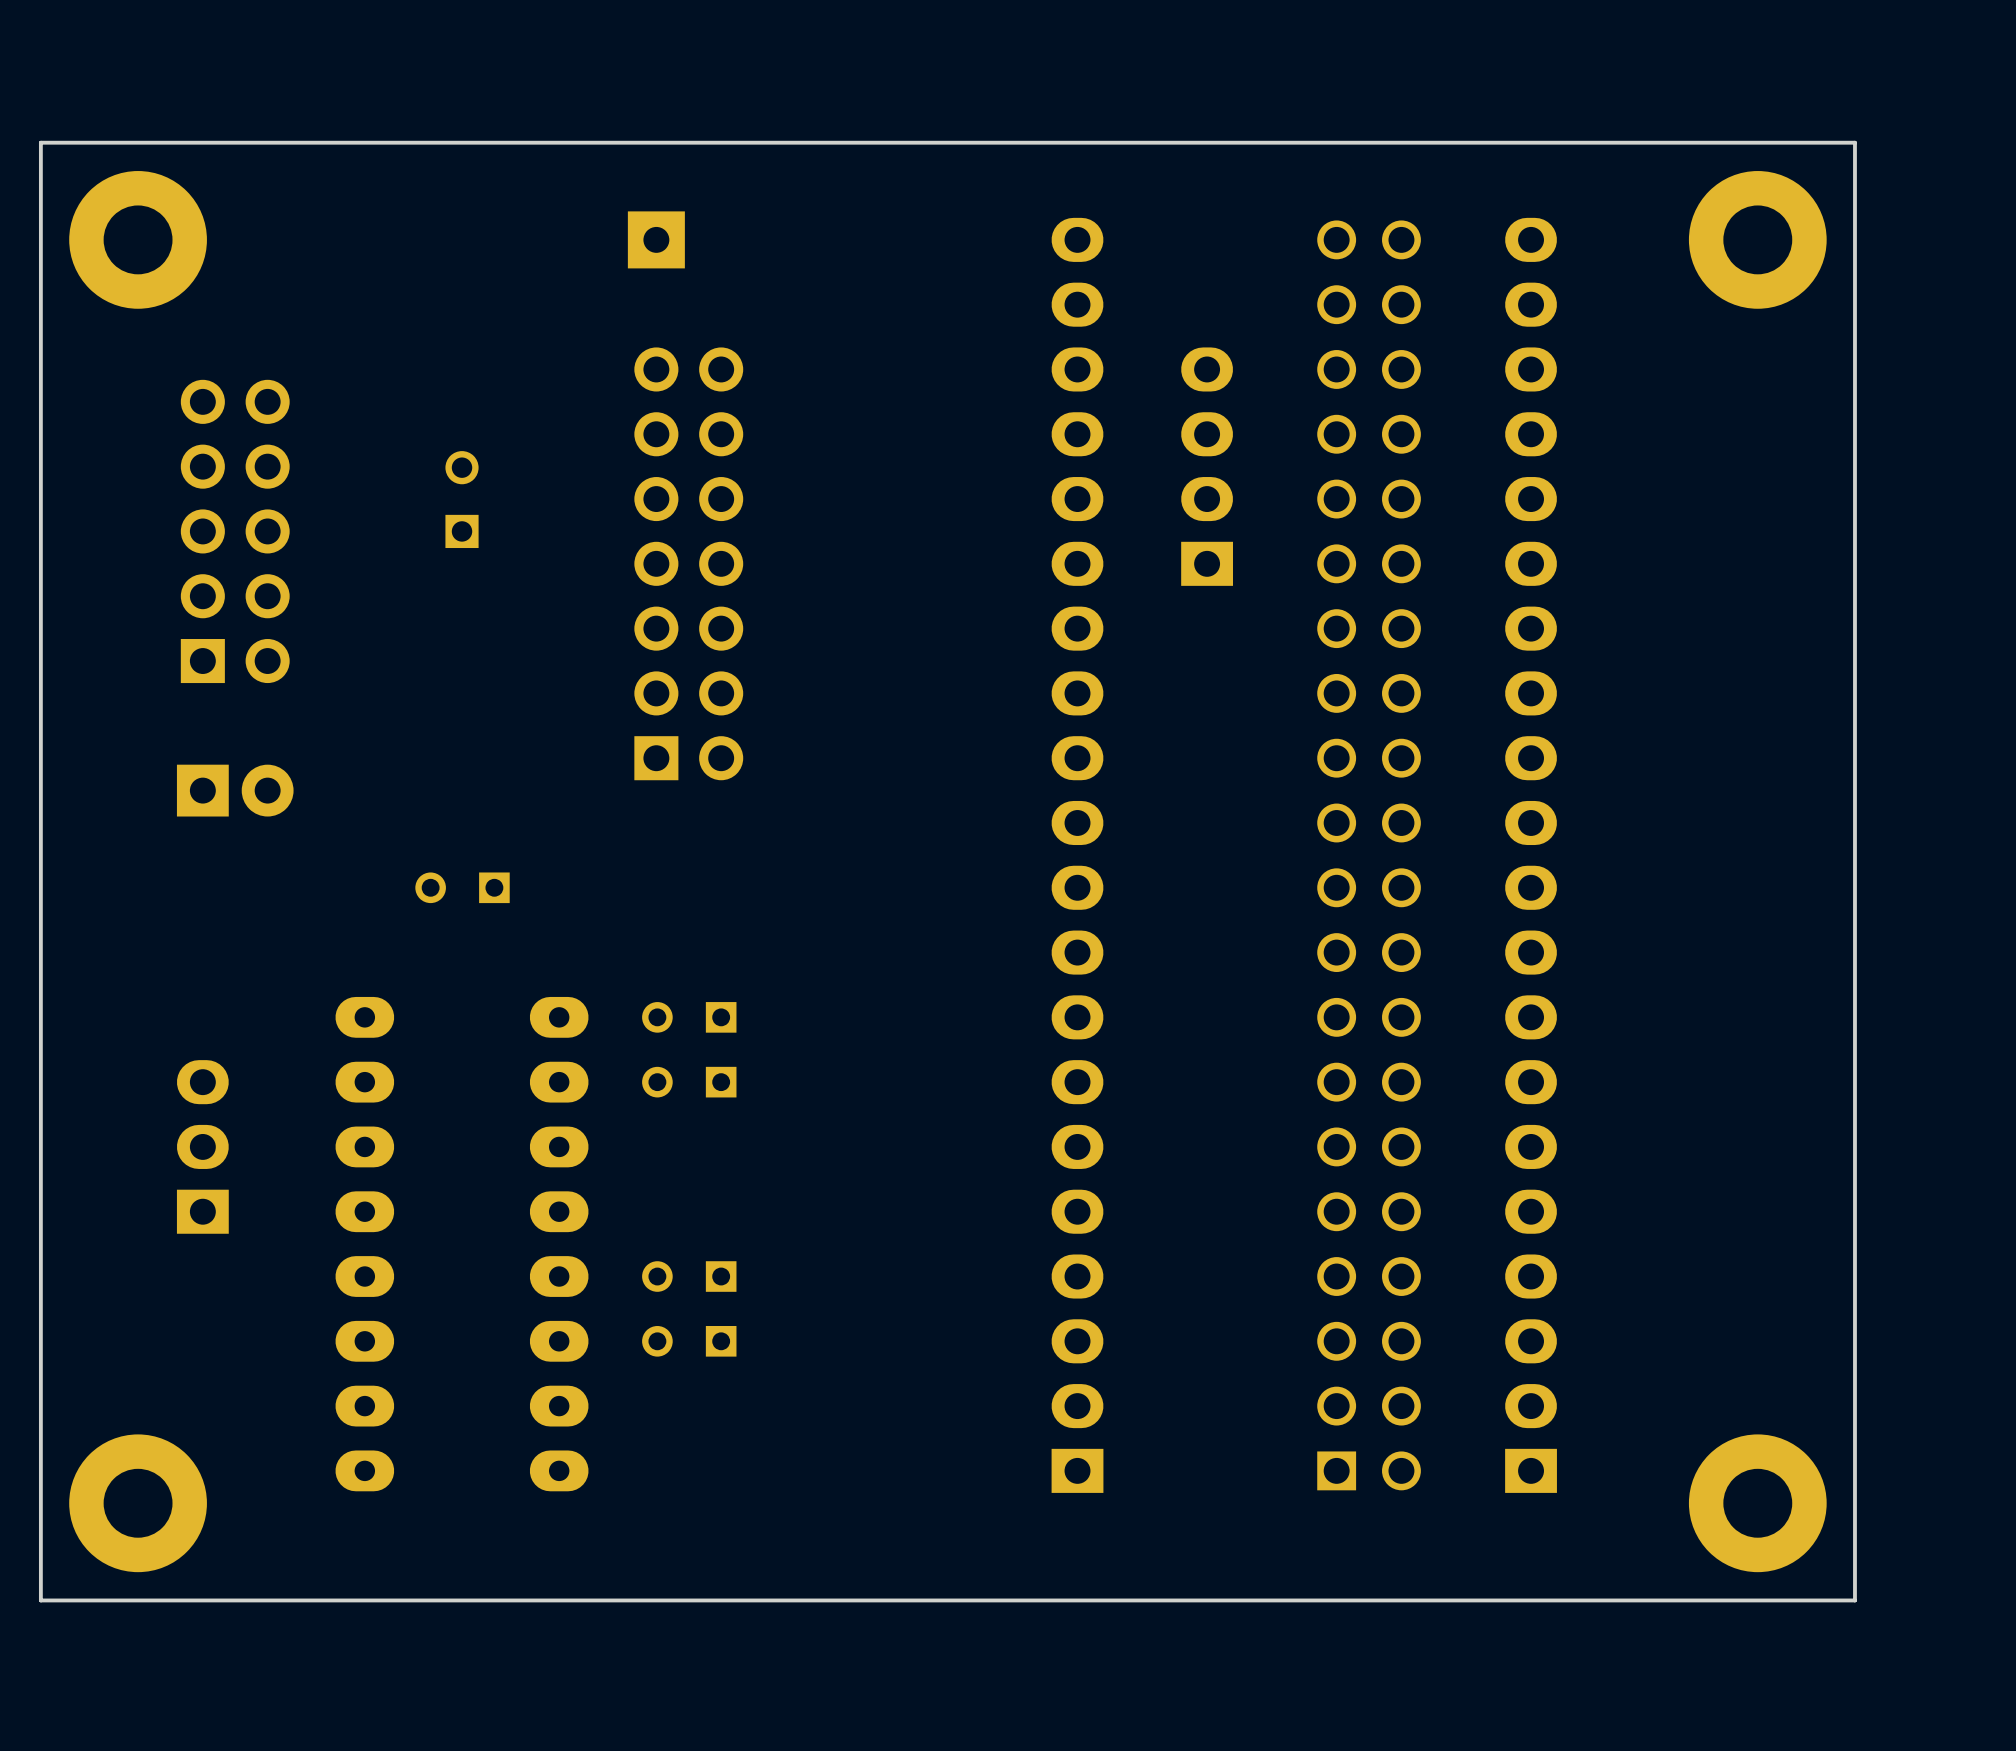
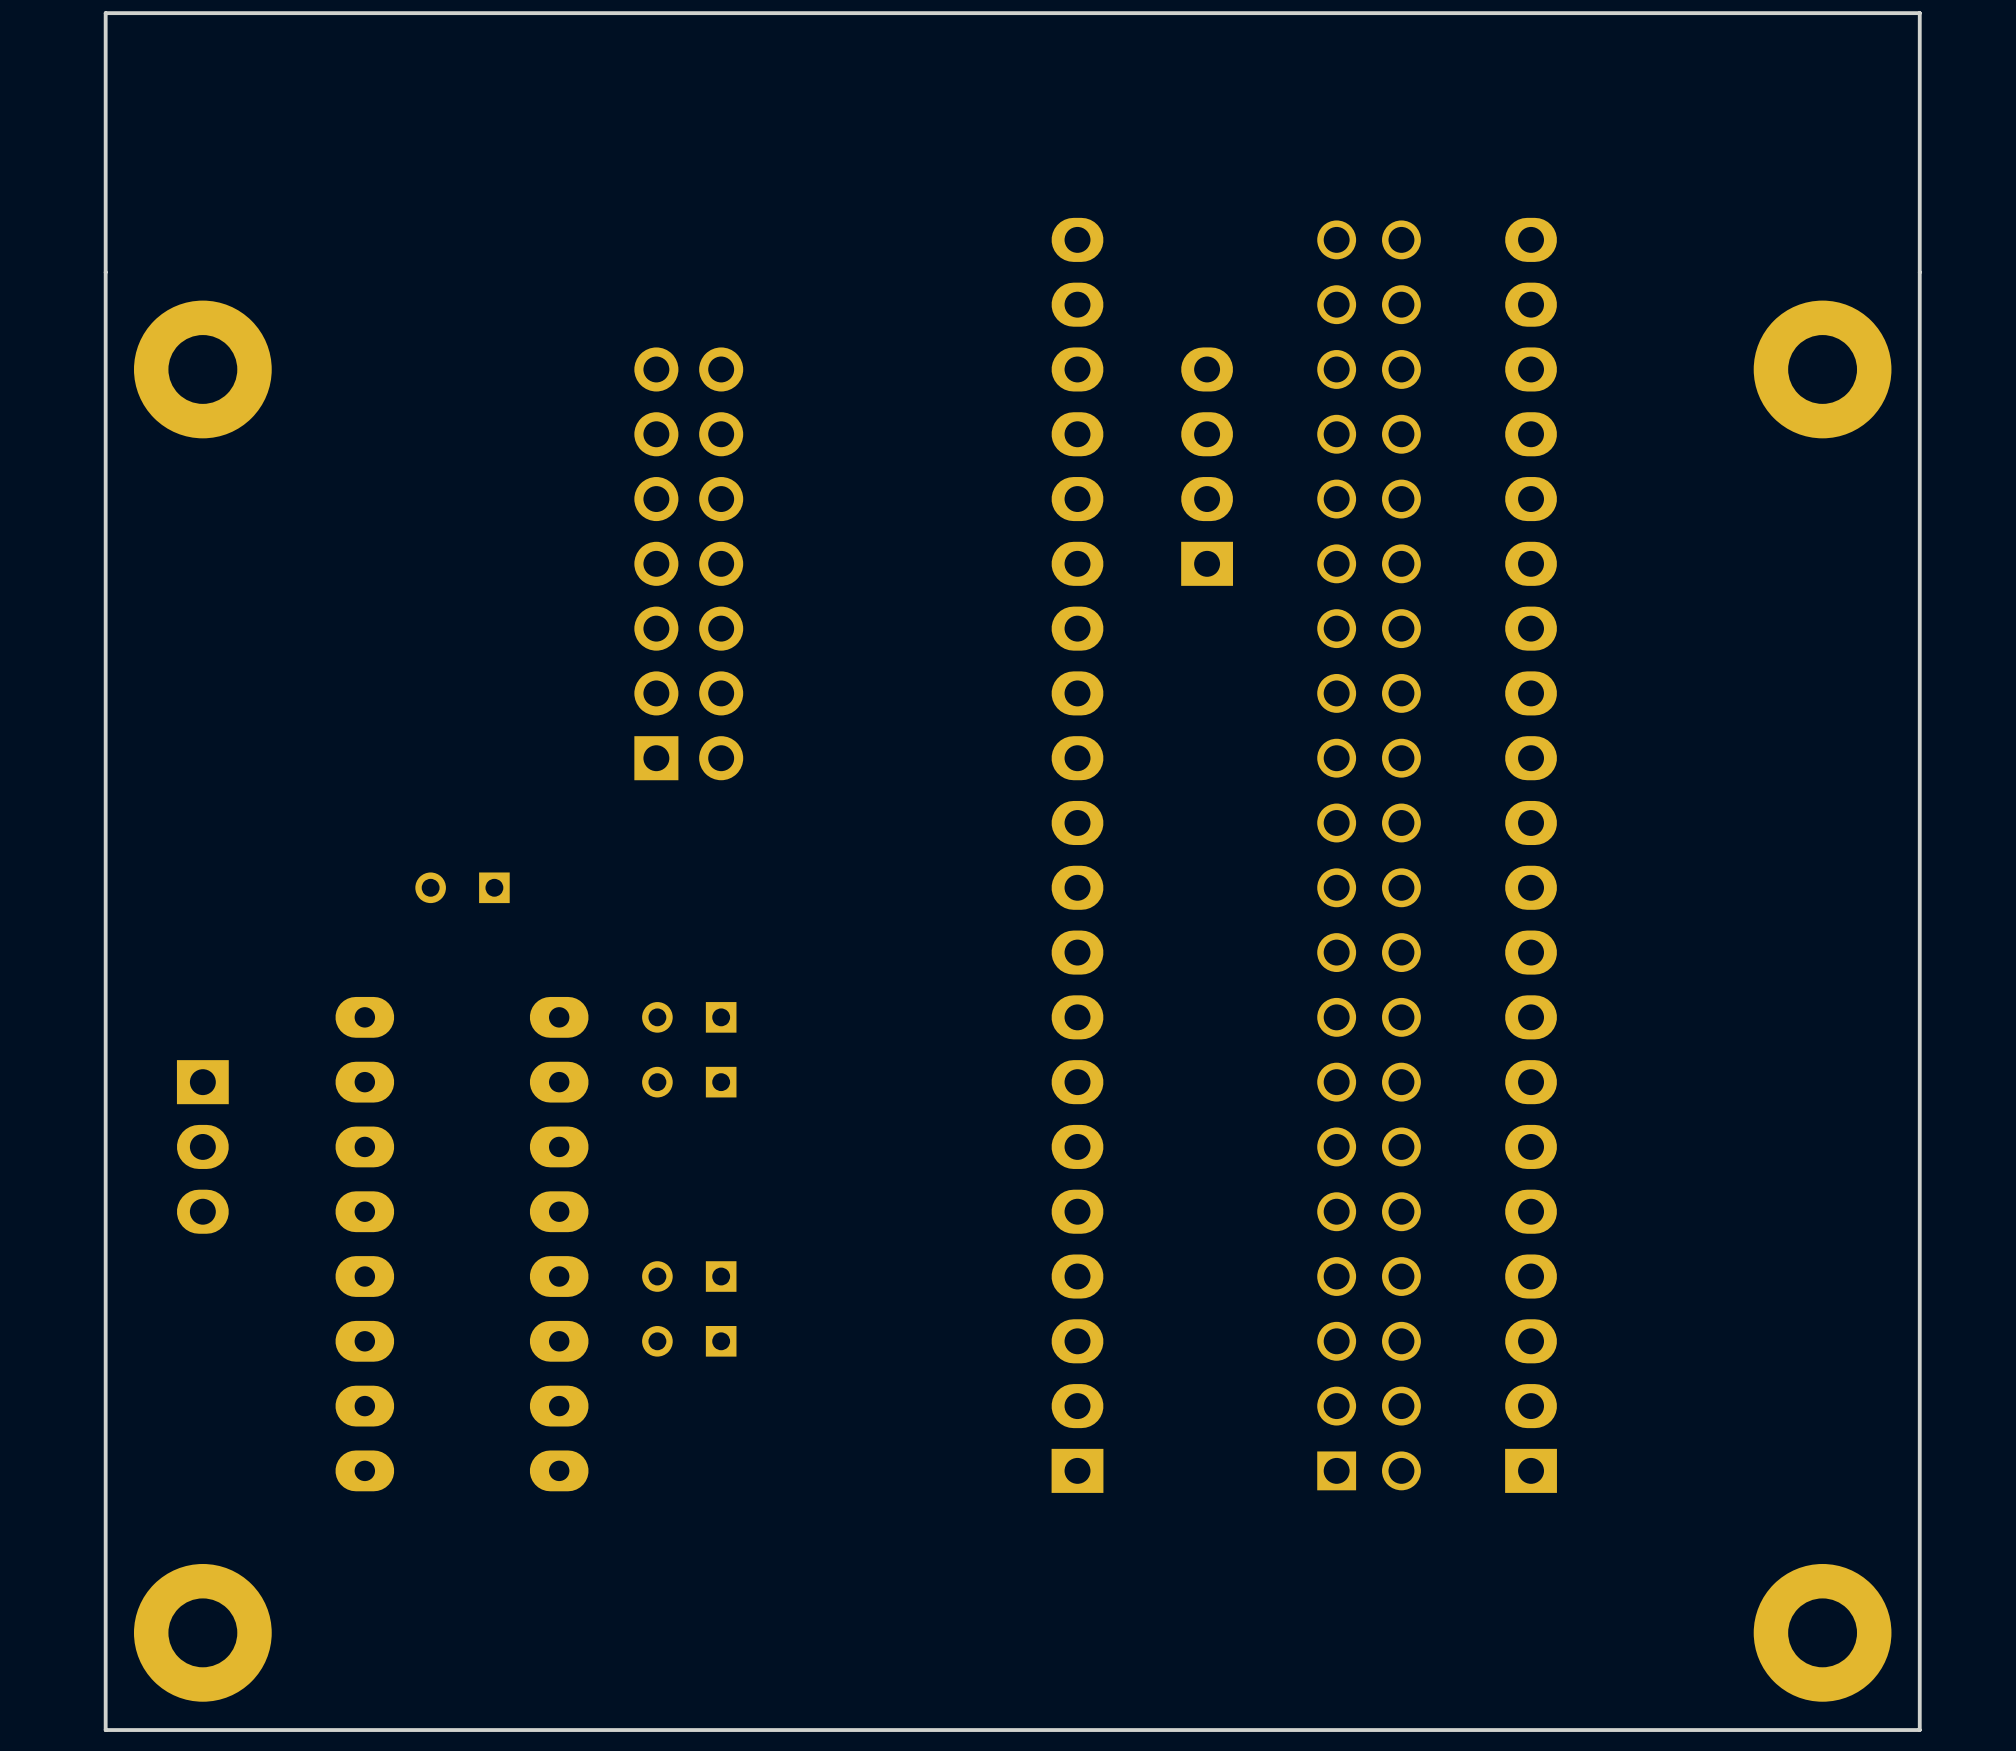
board edge: (1854, 142) (40, 142) (40, 1600) (1854, 1600) (1854, 142) -> (1919, 13) (1919, 1730) (105, 1730) (105, 13) (1919, 13)
part position: (138, 239) -> (202, 369)
part: (656, 239) -> none
part position: (1757, 239) -> (1822, 369)
part: (462, 499) -> none
part: (235, 531) -> none
part: (235, 790) -> none
part rotation: 0° (202, 1146) -> 180° (202, 1146)
part position: (138, 1503) -> (202, 1632)
part position: (1757, 1503) -> (1822, 1632)

